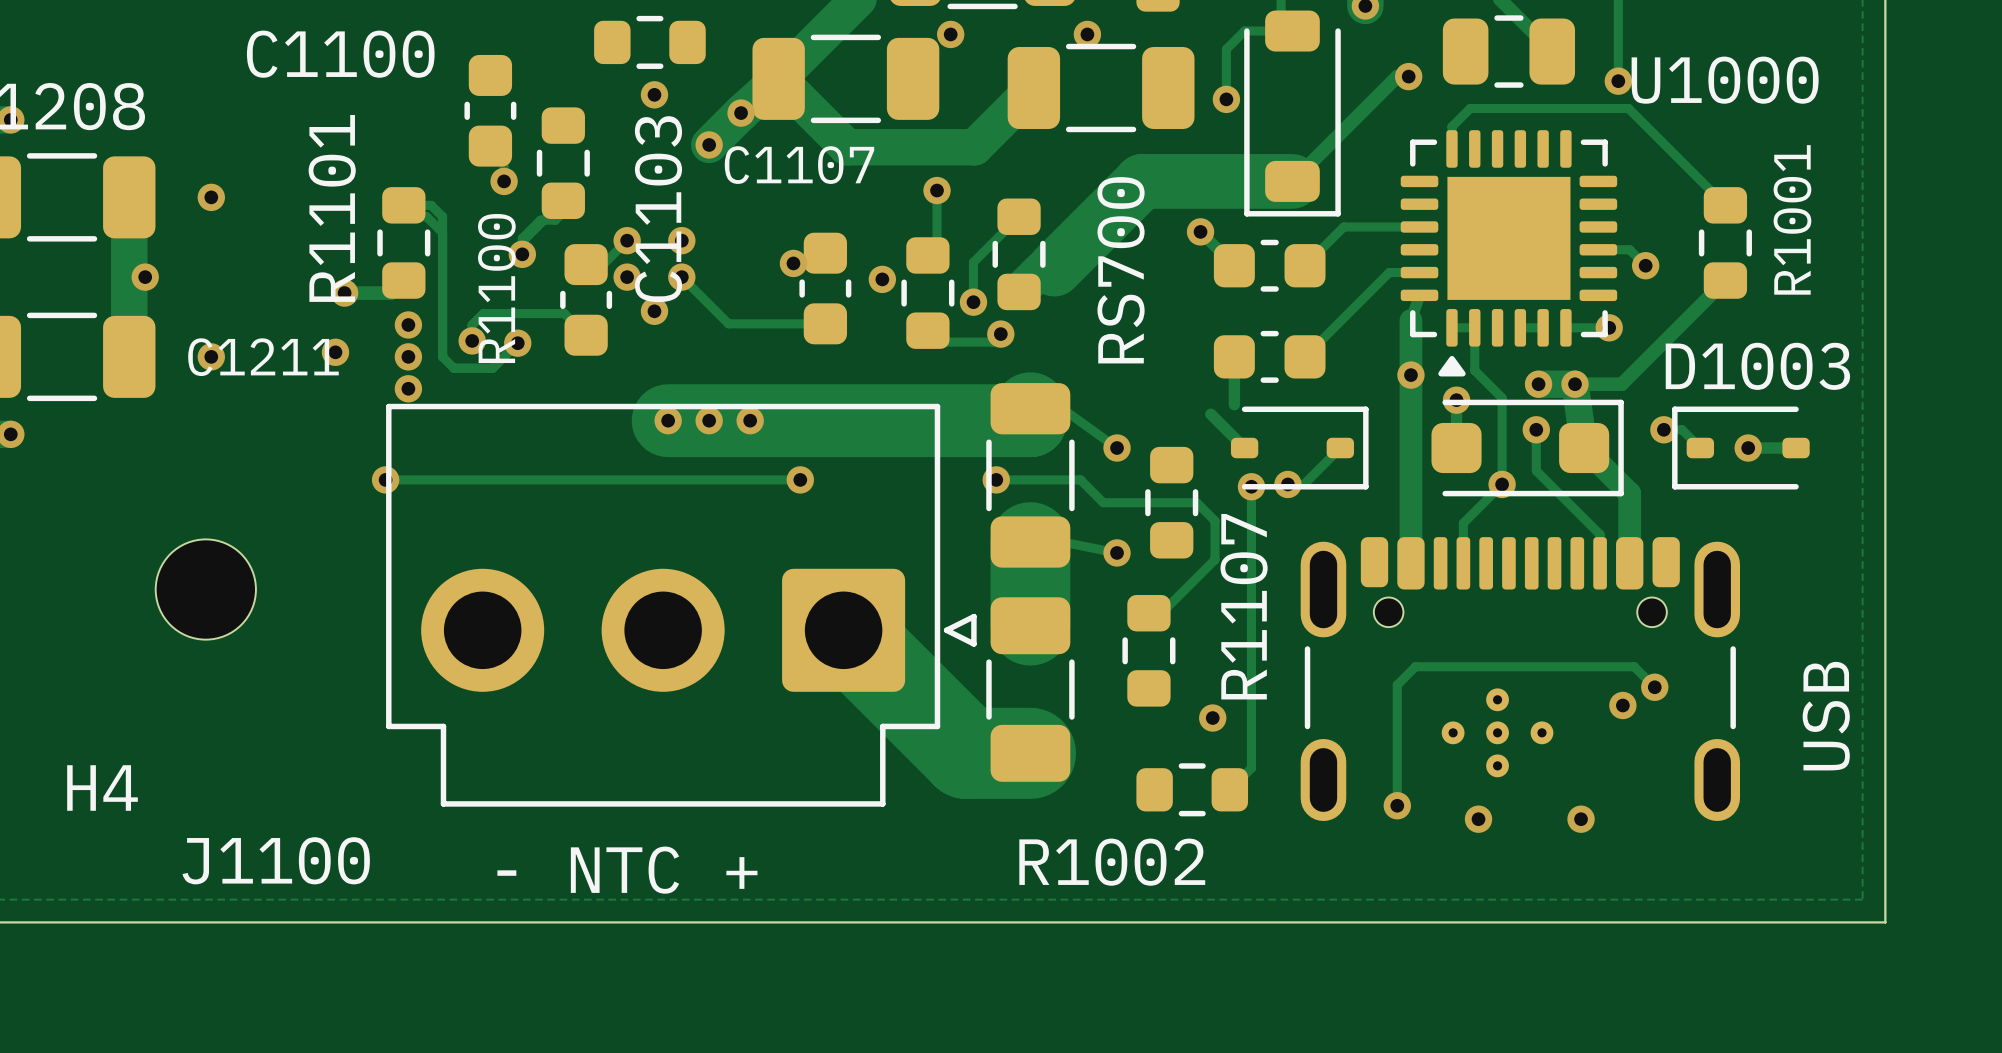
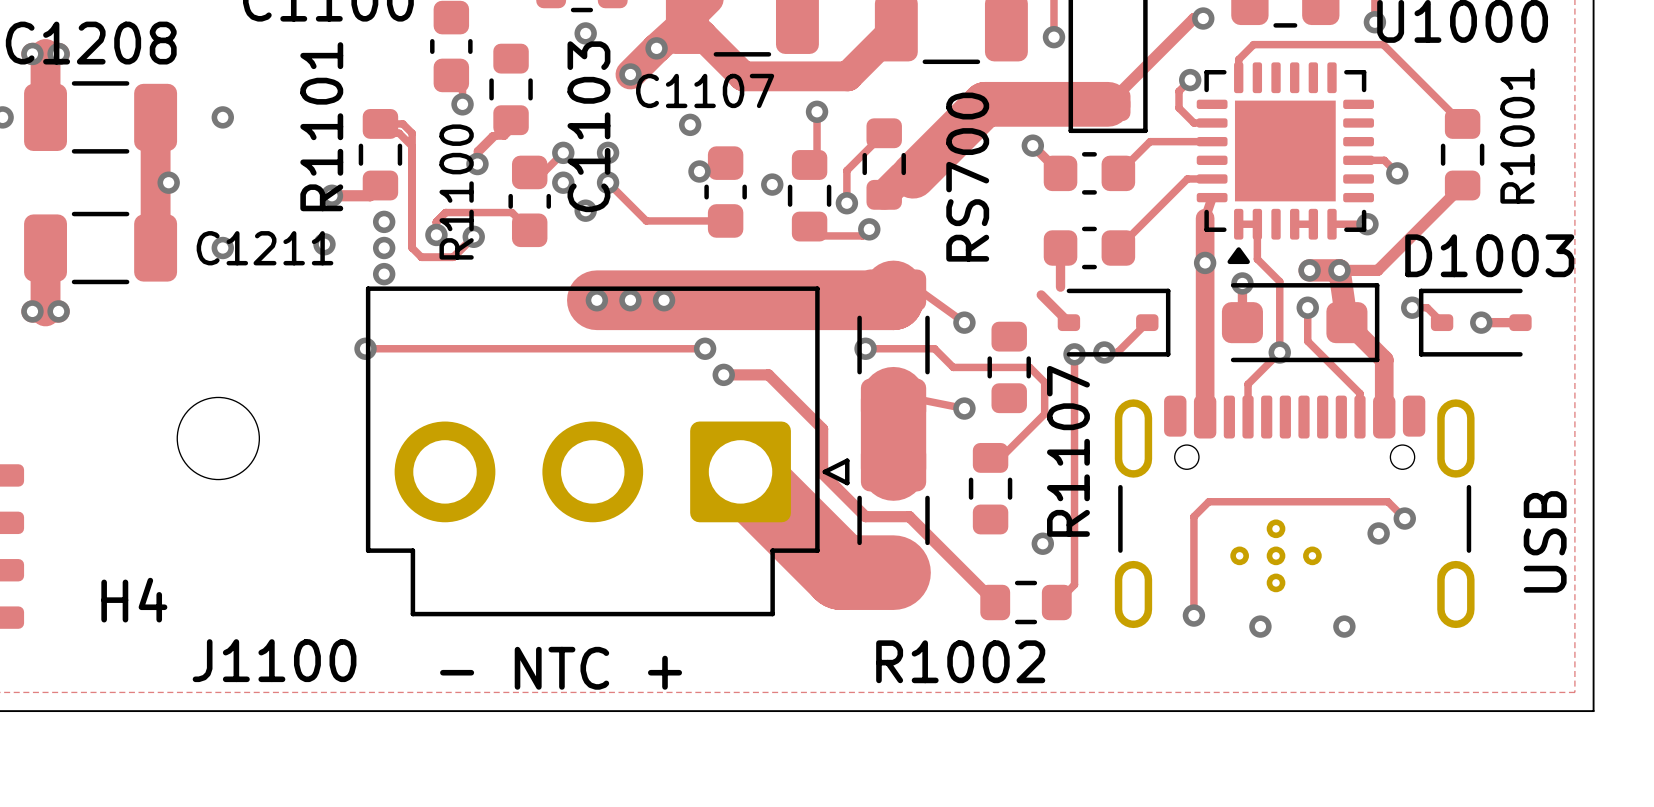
track: none -> (1190, 80) (1179, 91) (1179, 108) (1193, 123) (1212, 123)
via: none -> (1190, 80)
via: none -> (690, 124)
track: none -> (723, 374) (768, 374) (822, 428) (822, 473) (865, 516) (909, 516) (995, 602)
via: none -> (723, 374)

